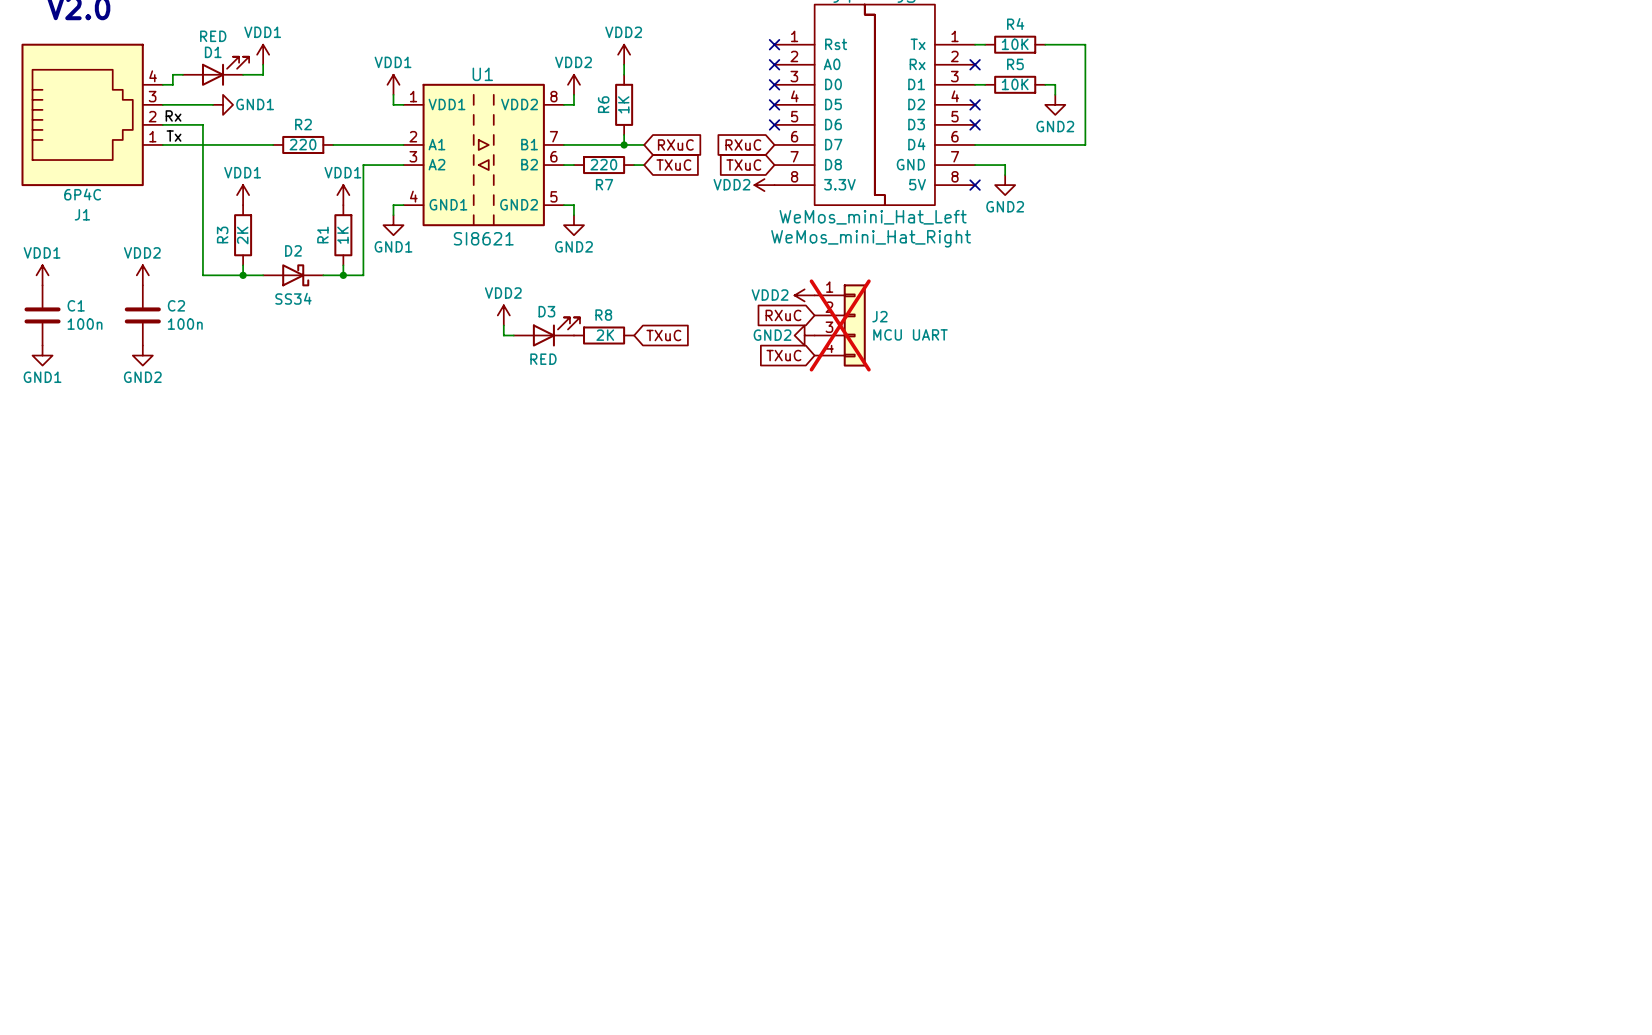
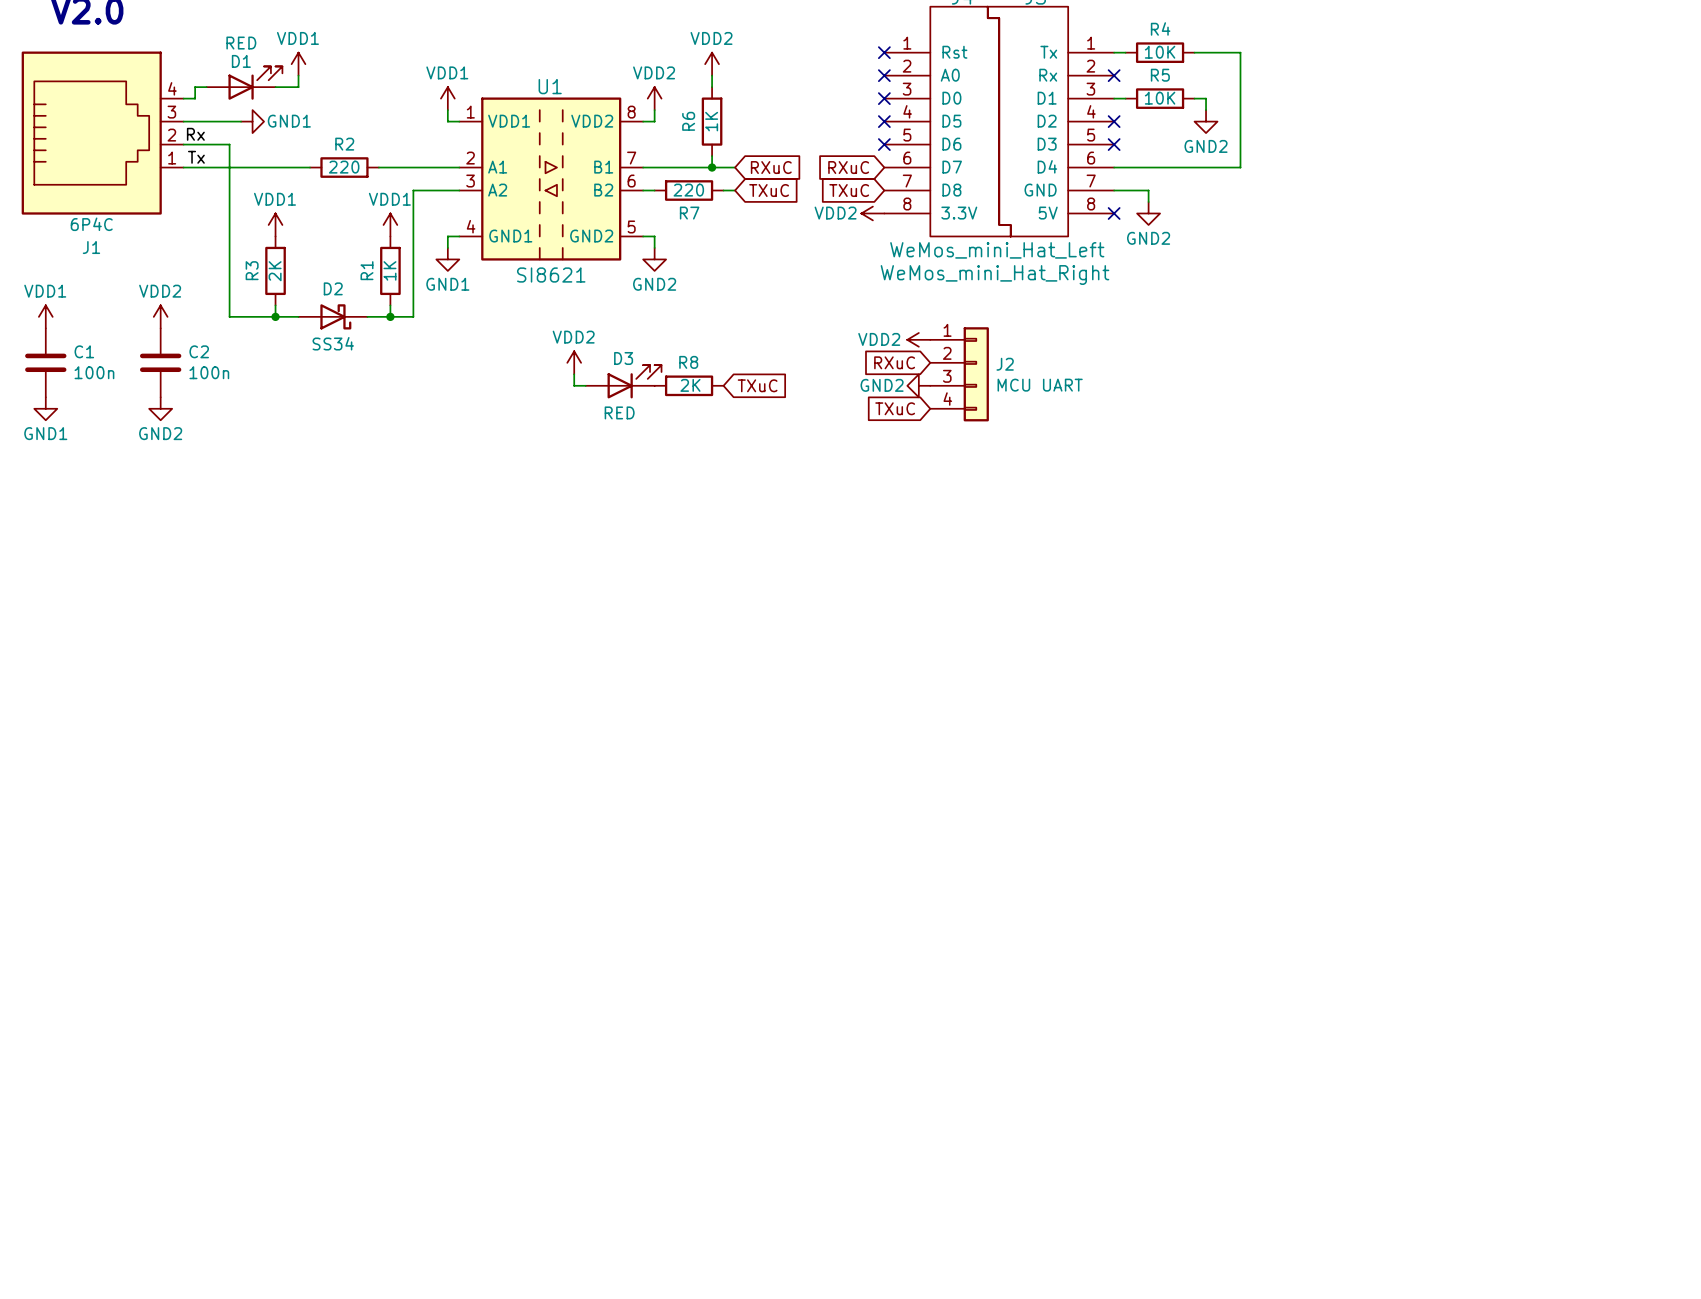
J2 do-not-place cross: (840, 325) -> none

